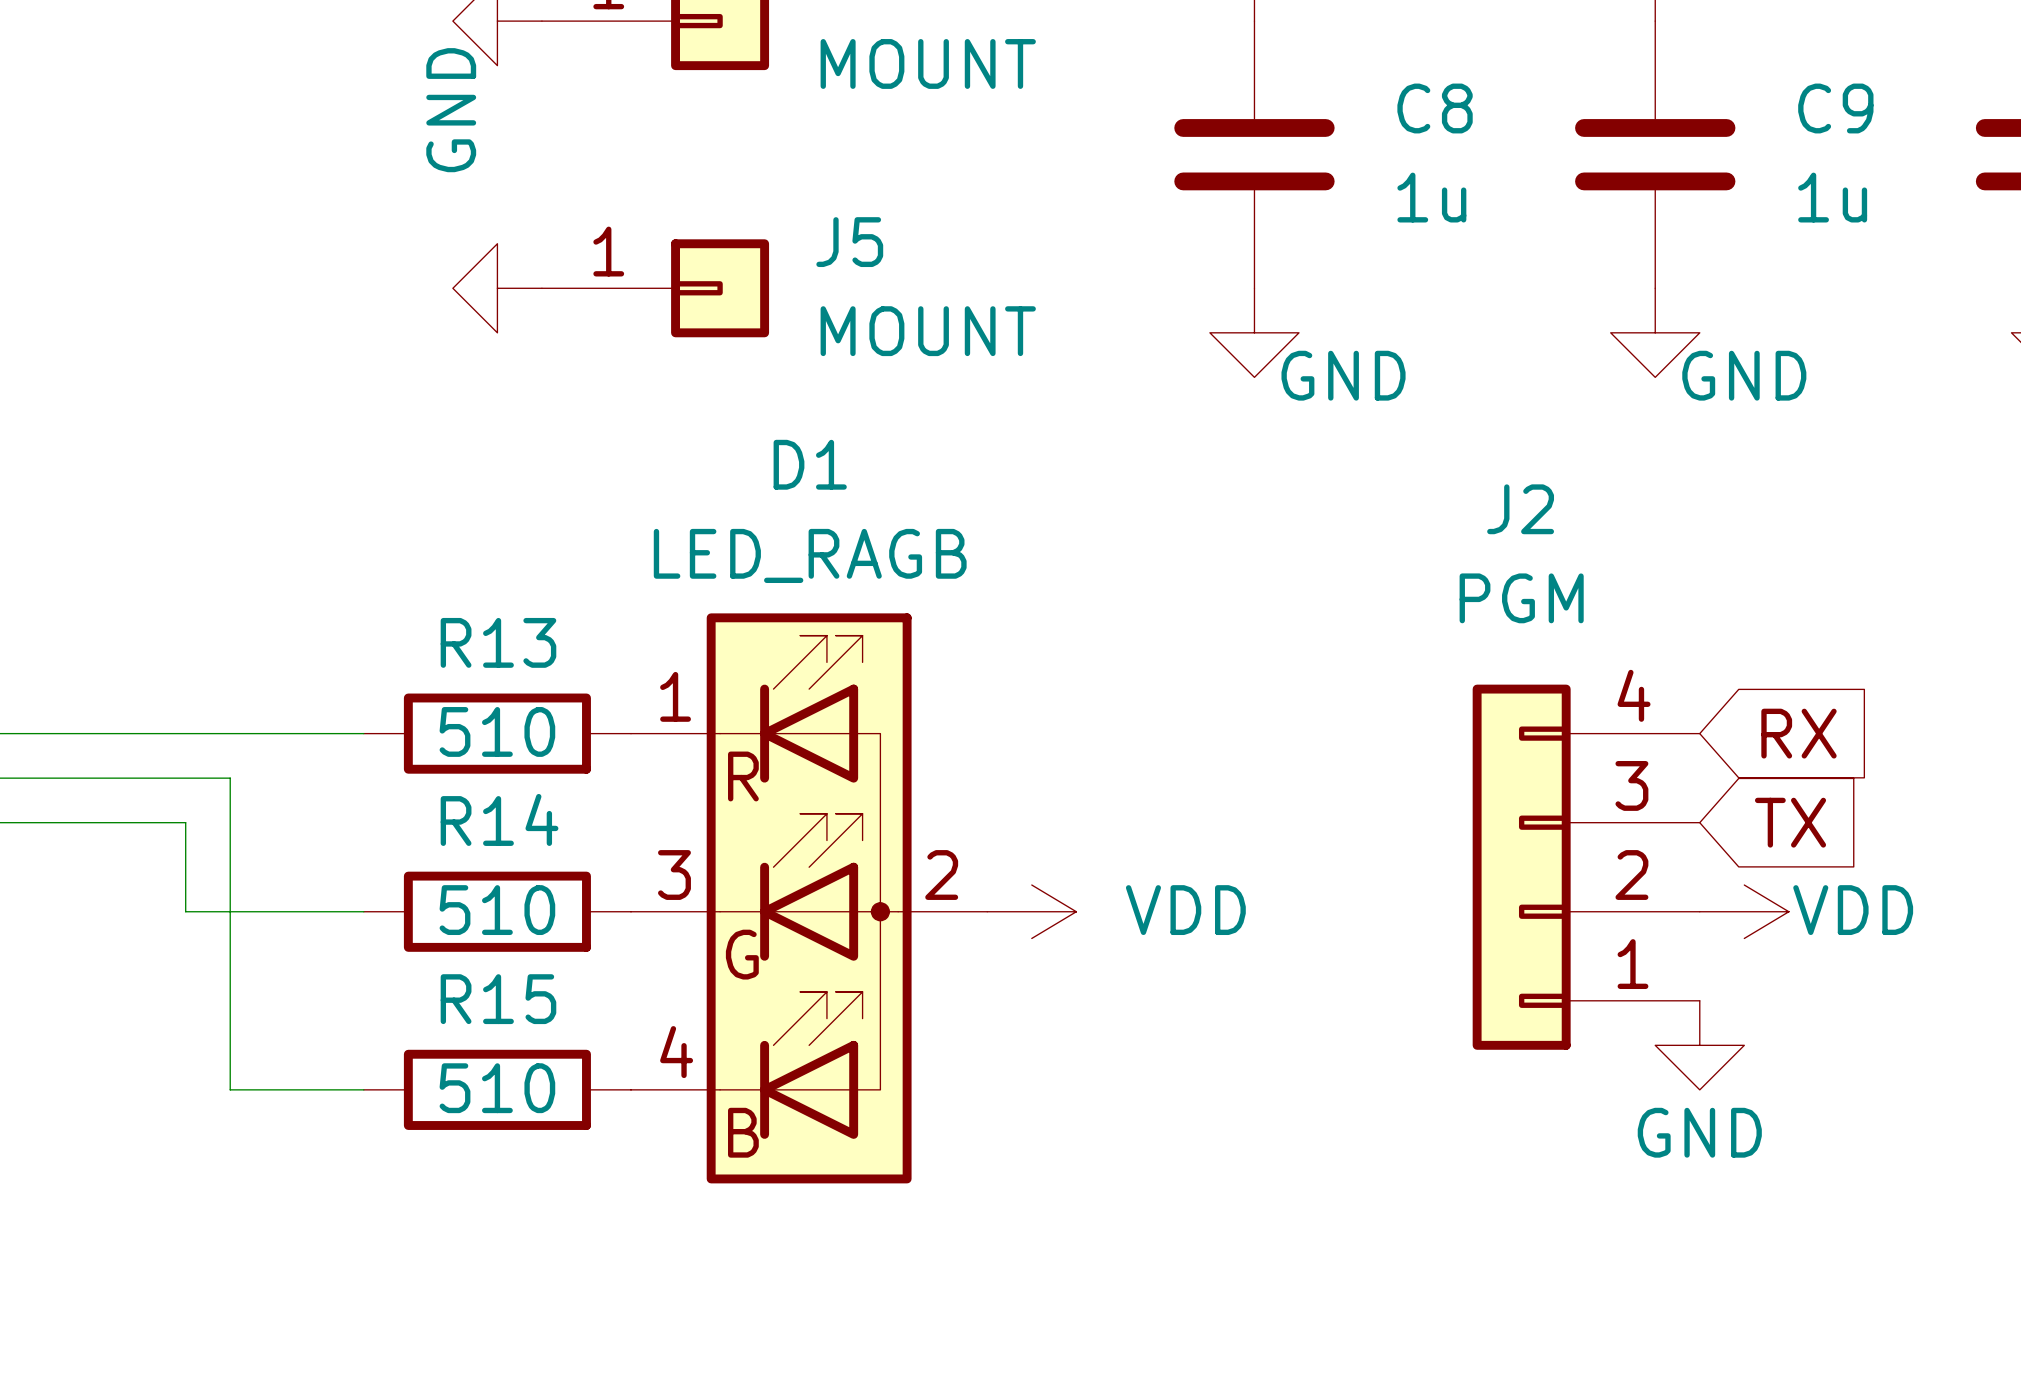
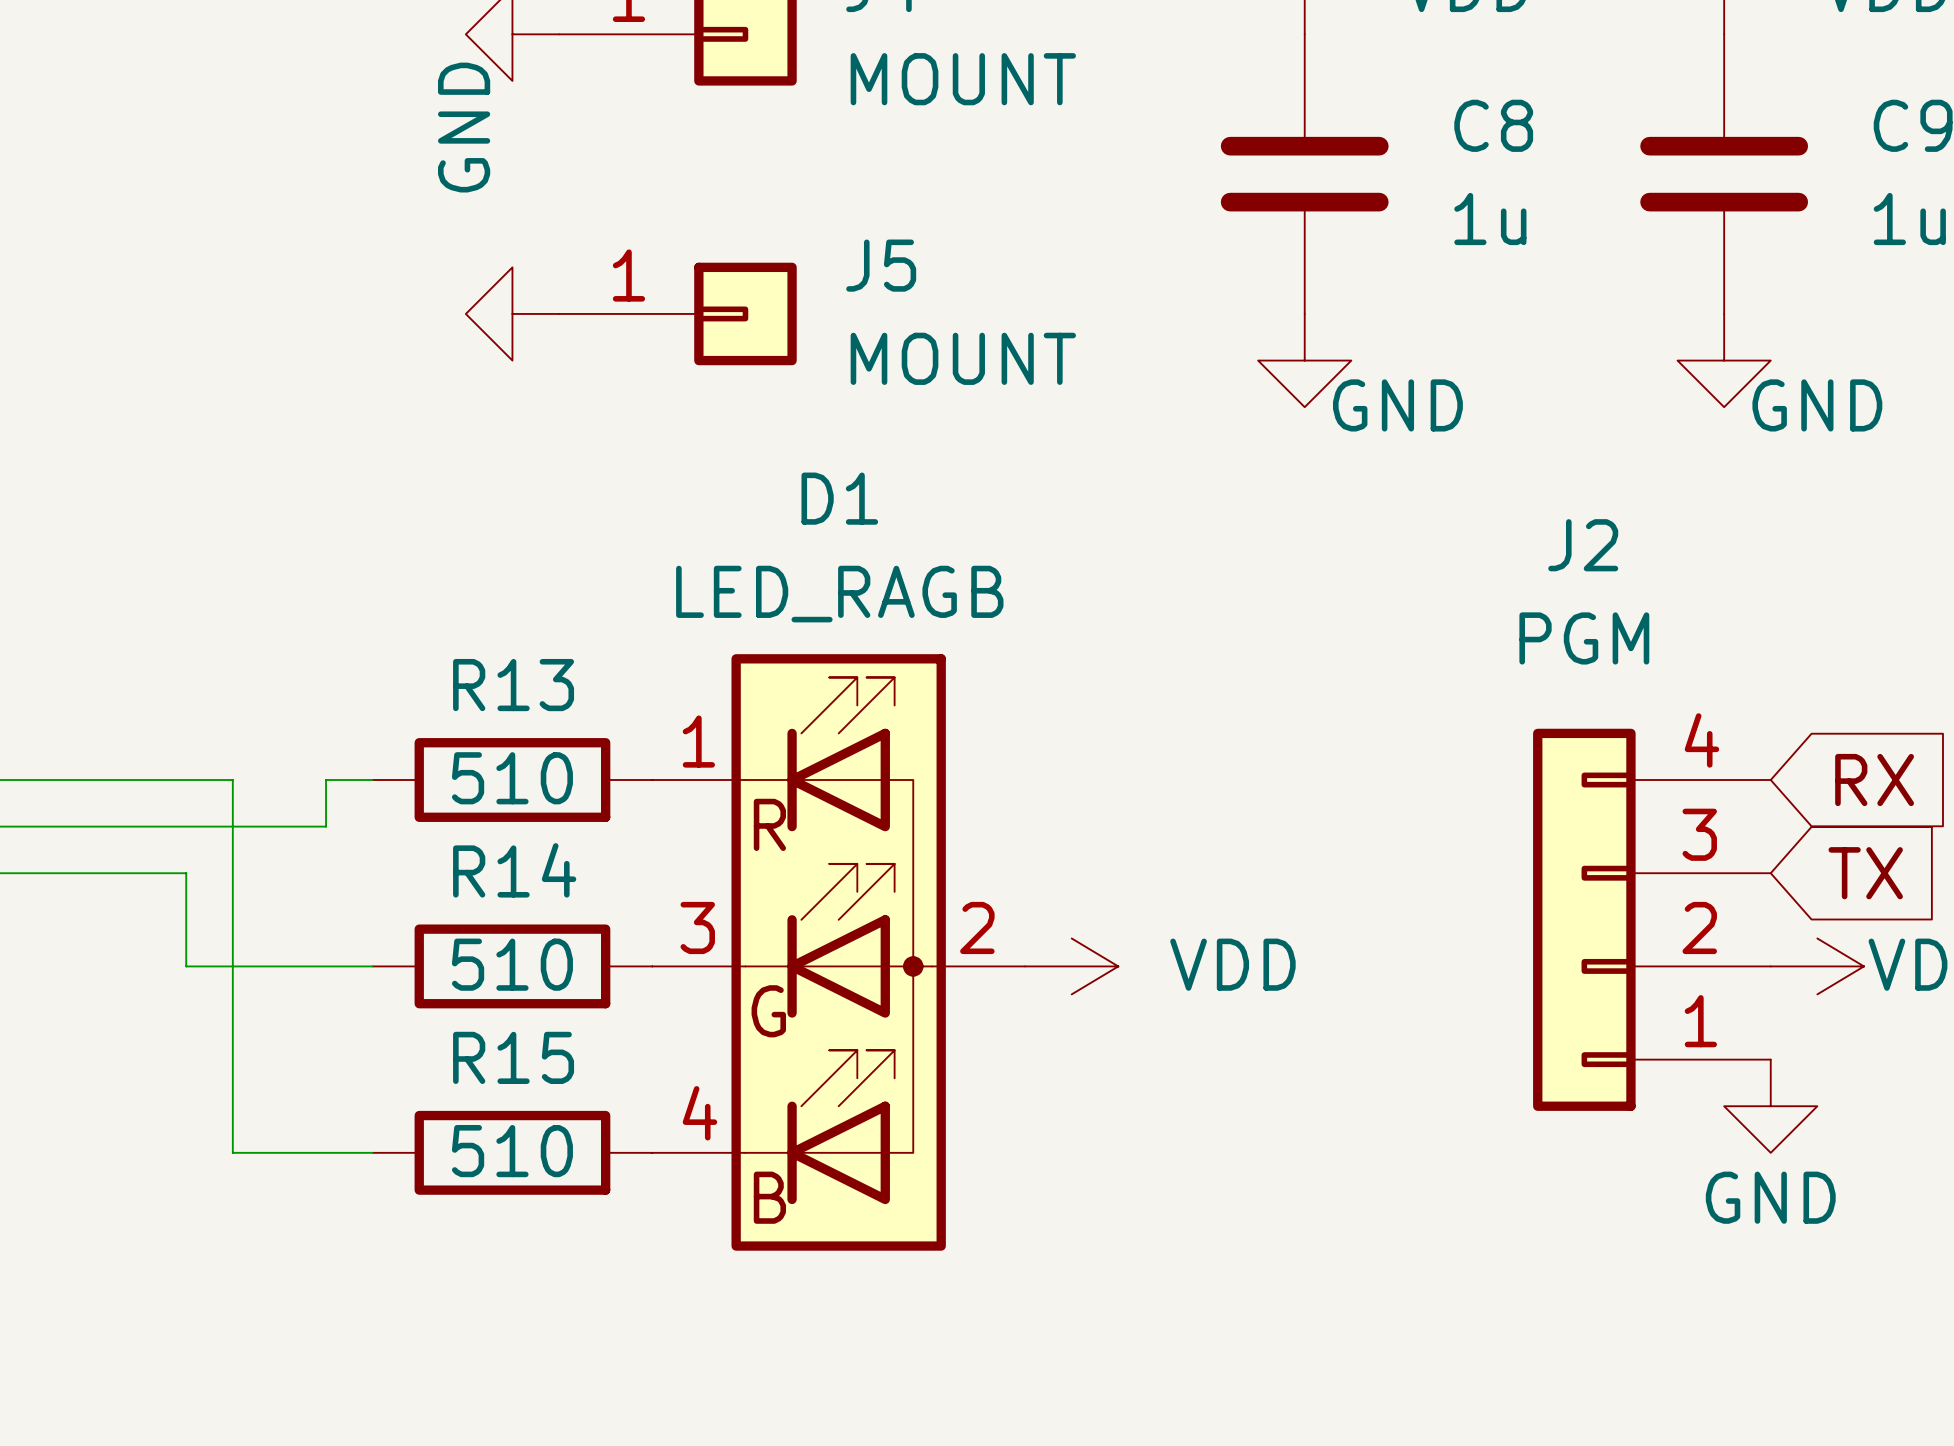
wire: (230, 733) (319, 733) -> (232, 780) (232, 826) (326, 826) (326, 780)

